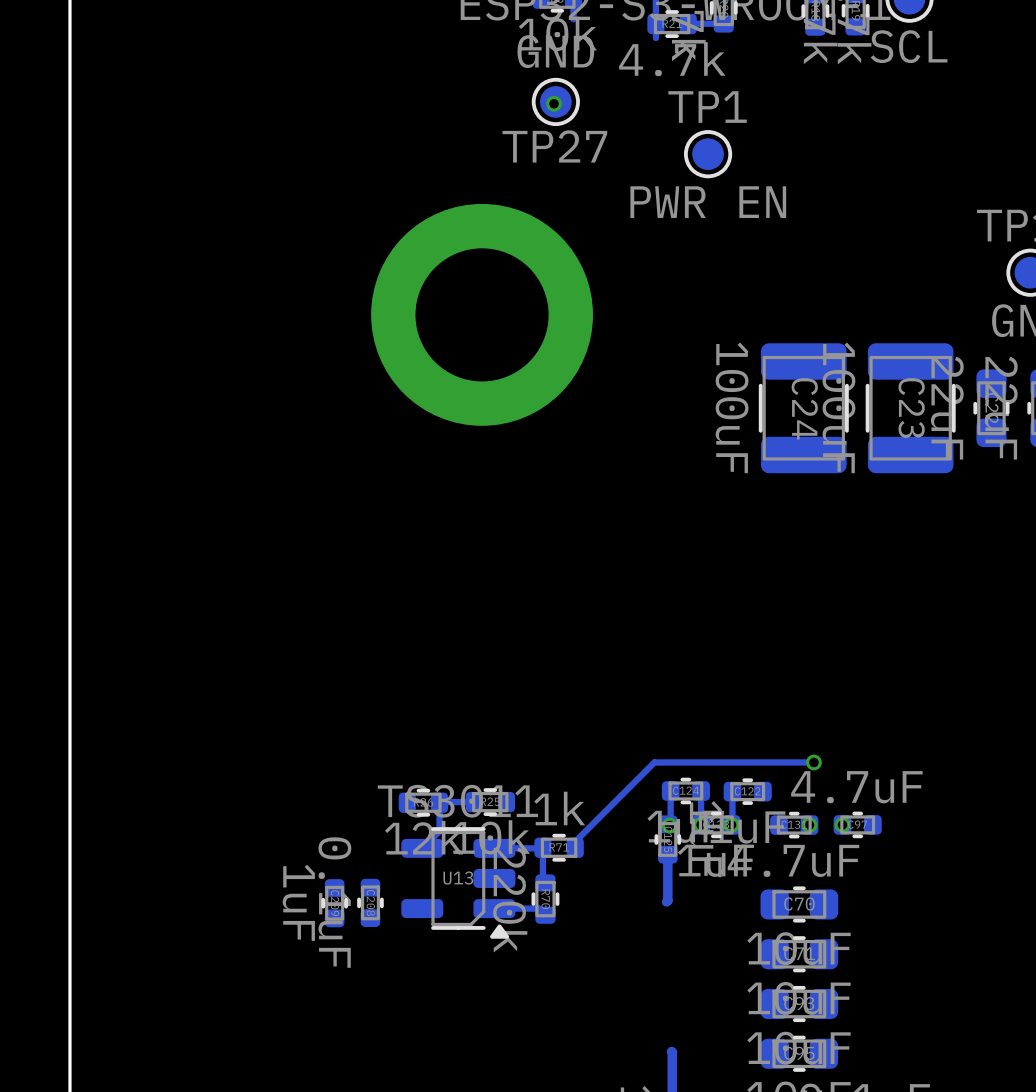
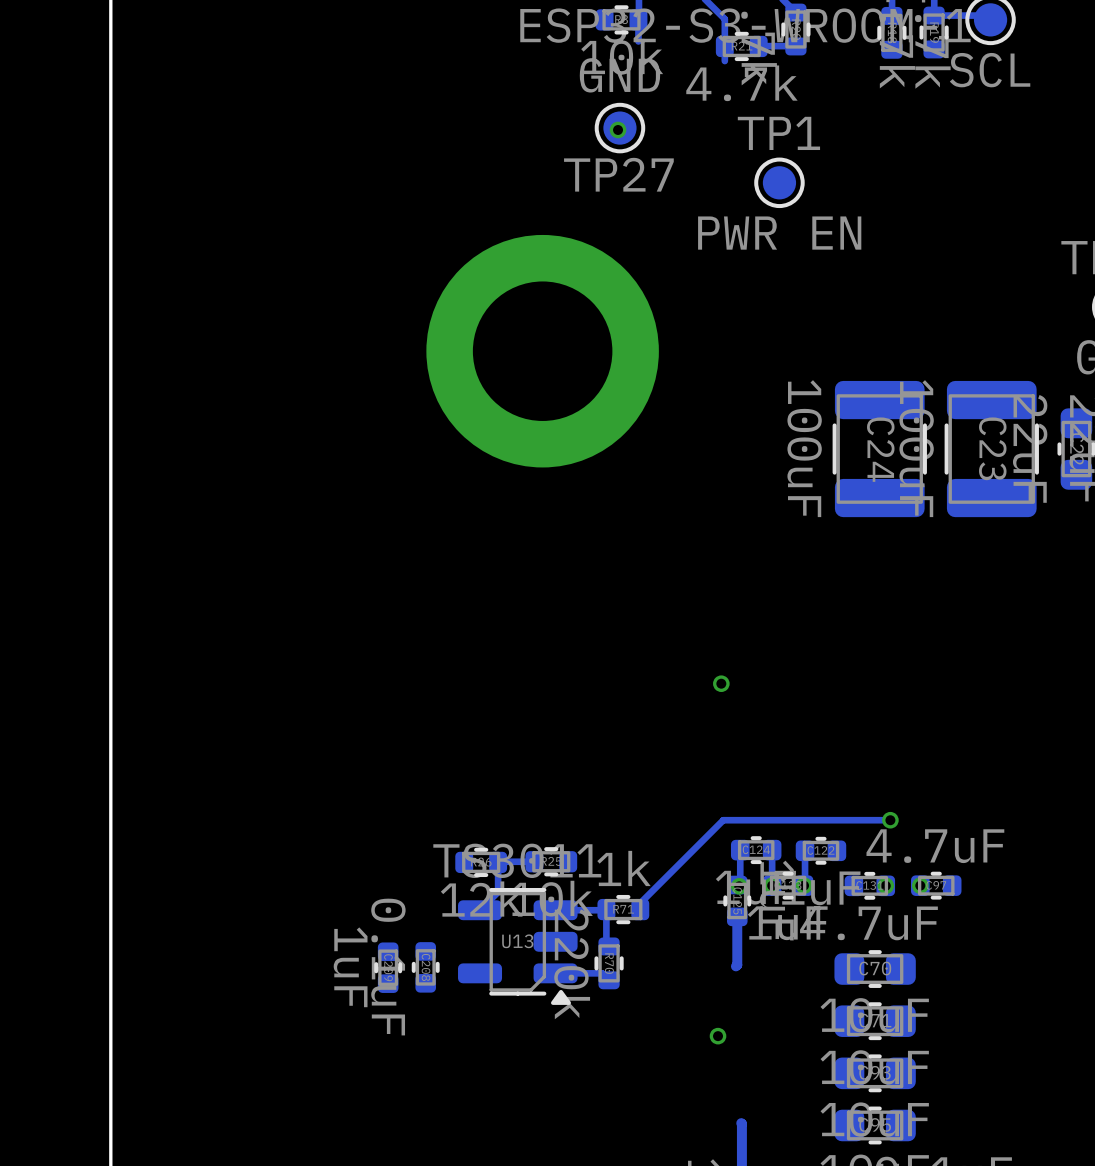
via: none -> (721, 683)
via: none -> (718, 1036)

